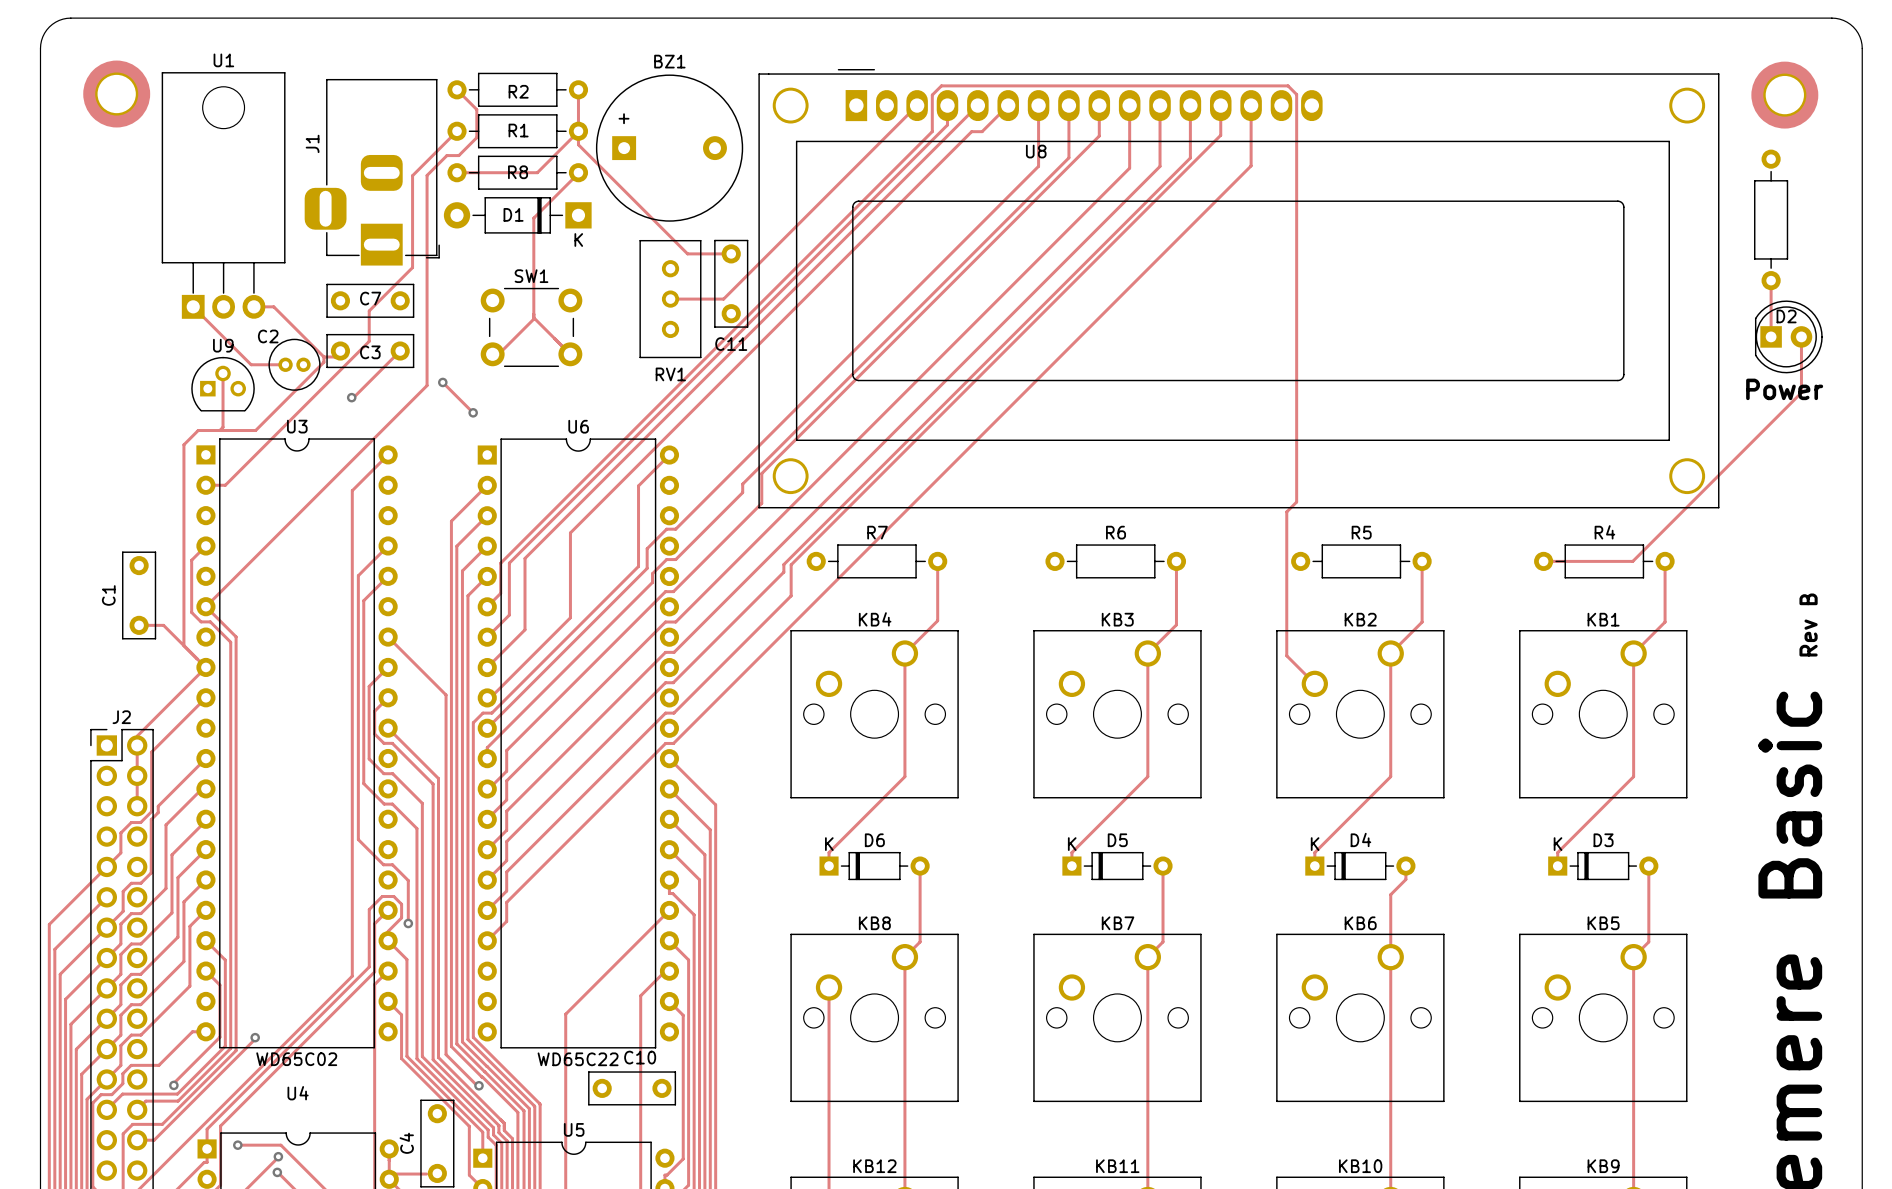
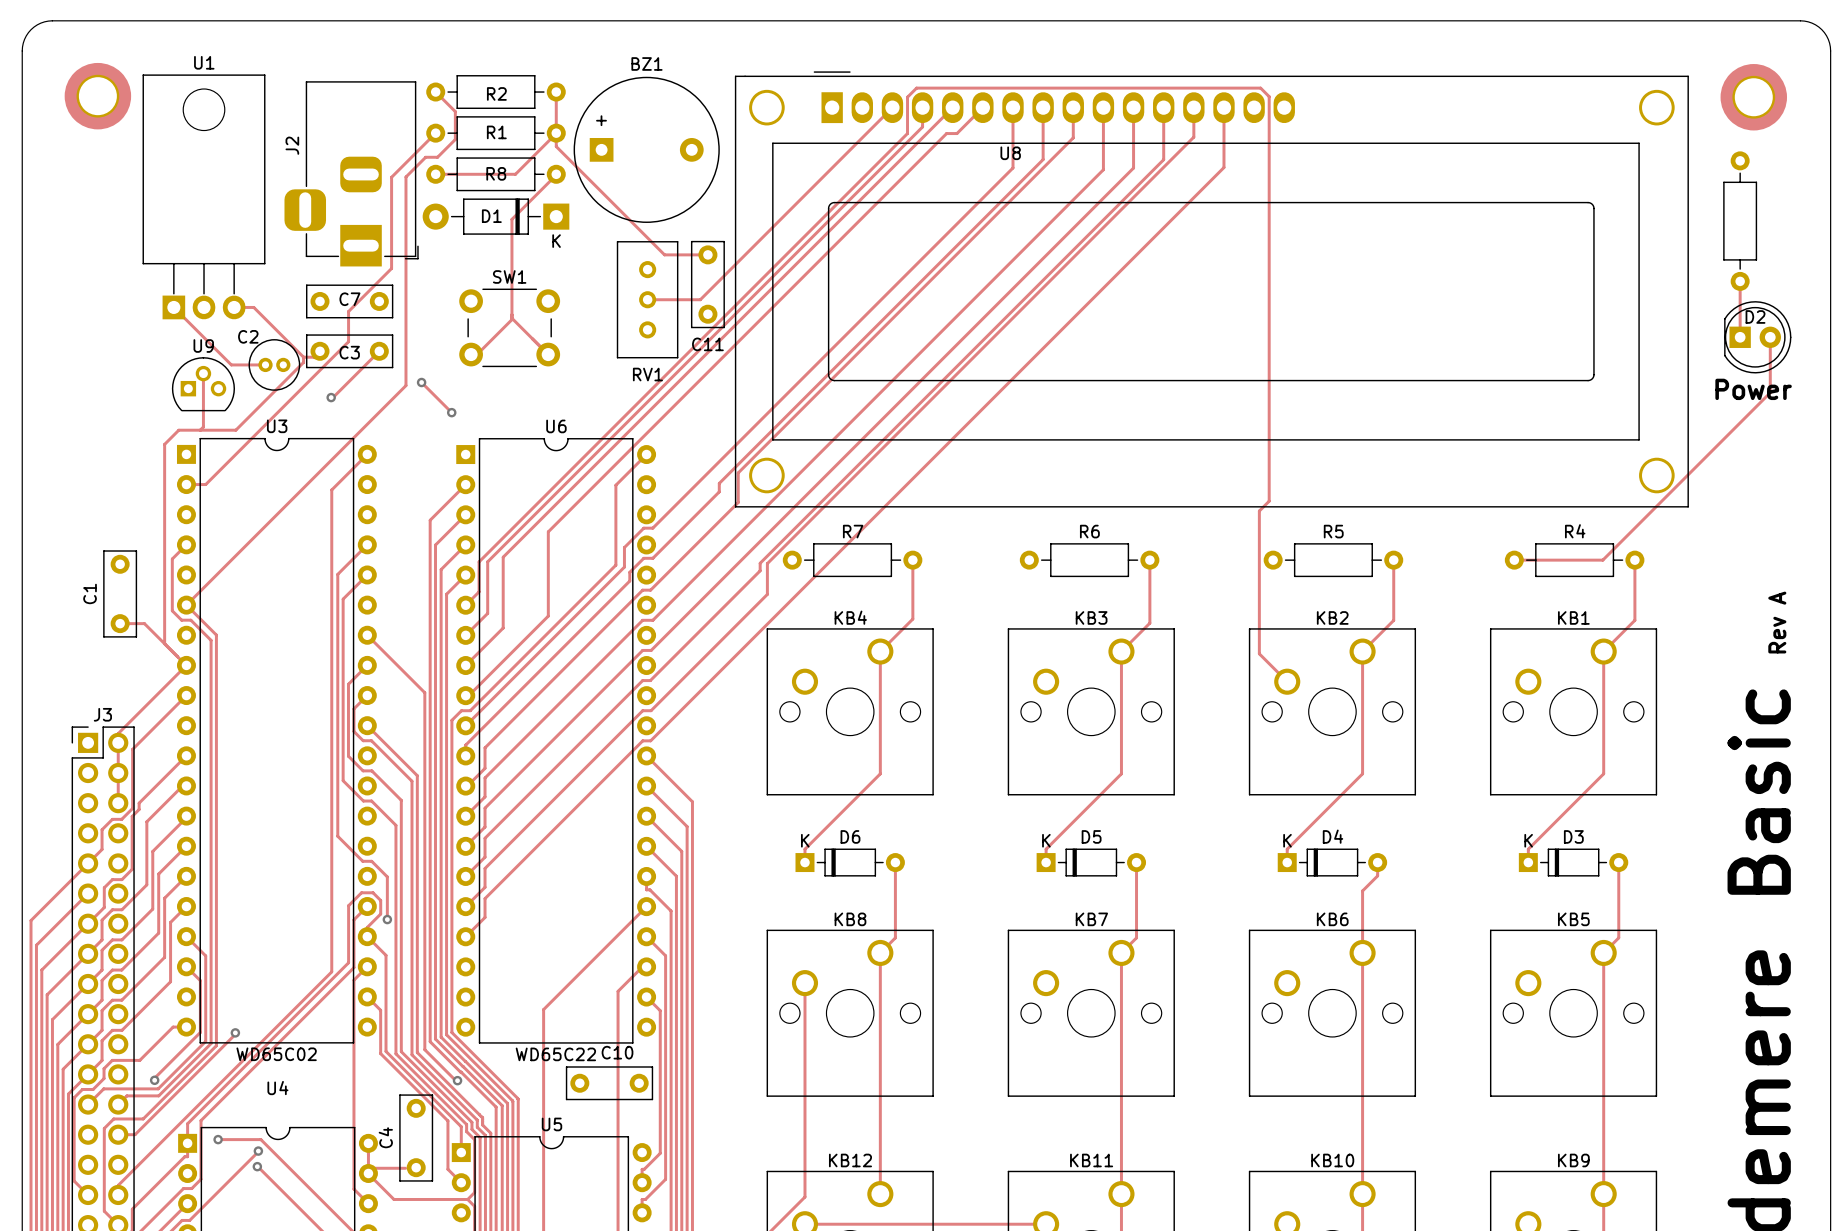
J1 name: J1 (312, 143) -> J2 (292, 145)
text: Rev B (1808, 625) -> Rev A (1777, 622)
J2 name: J2 (121, 717) -> J3 (102, 714)

